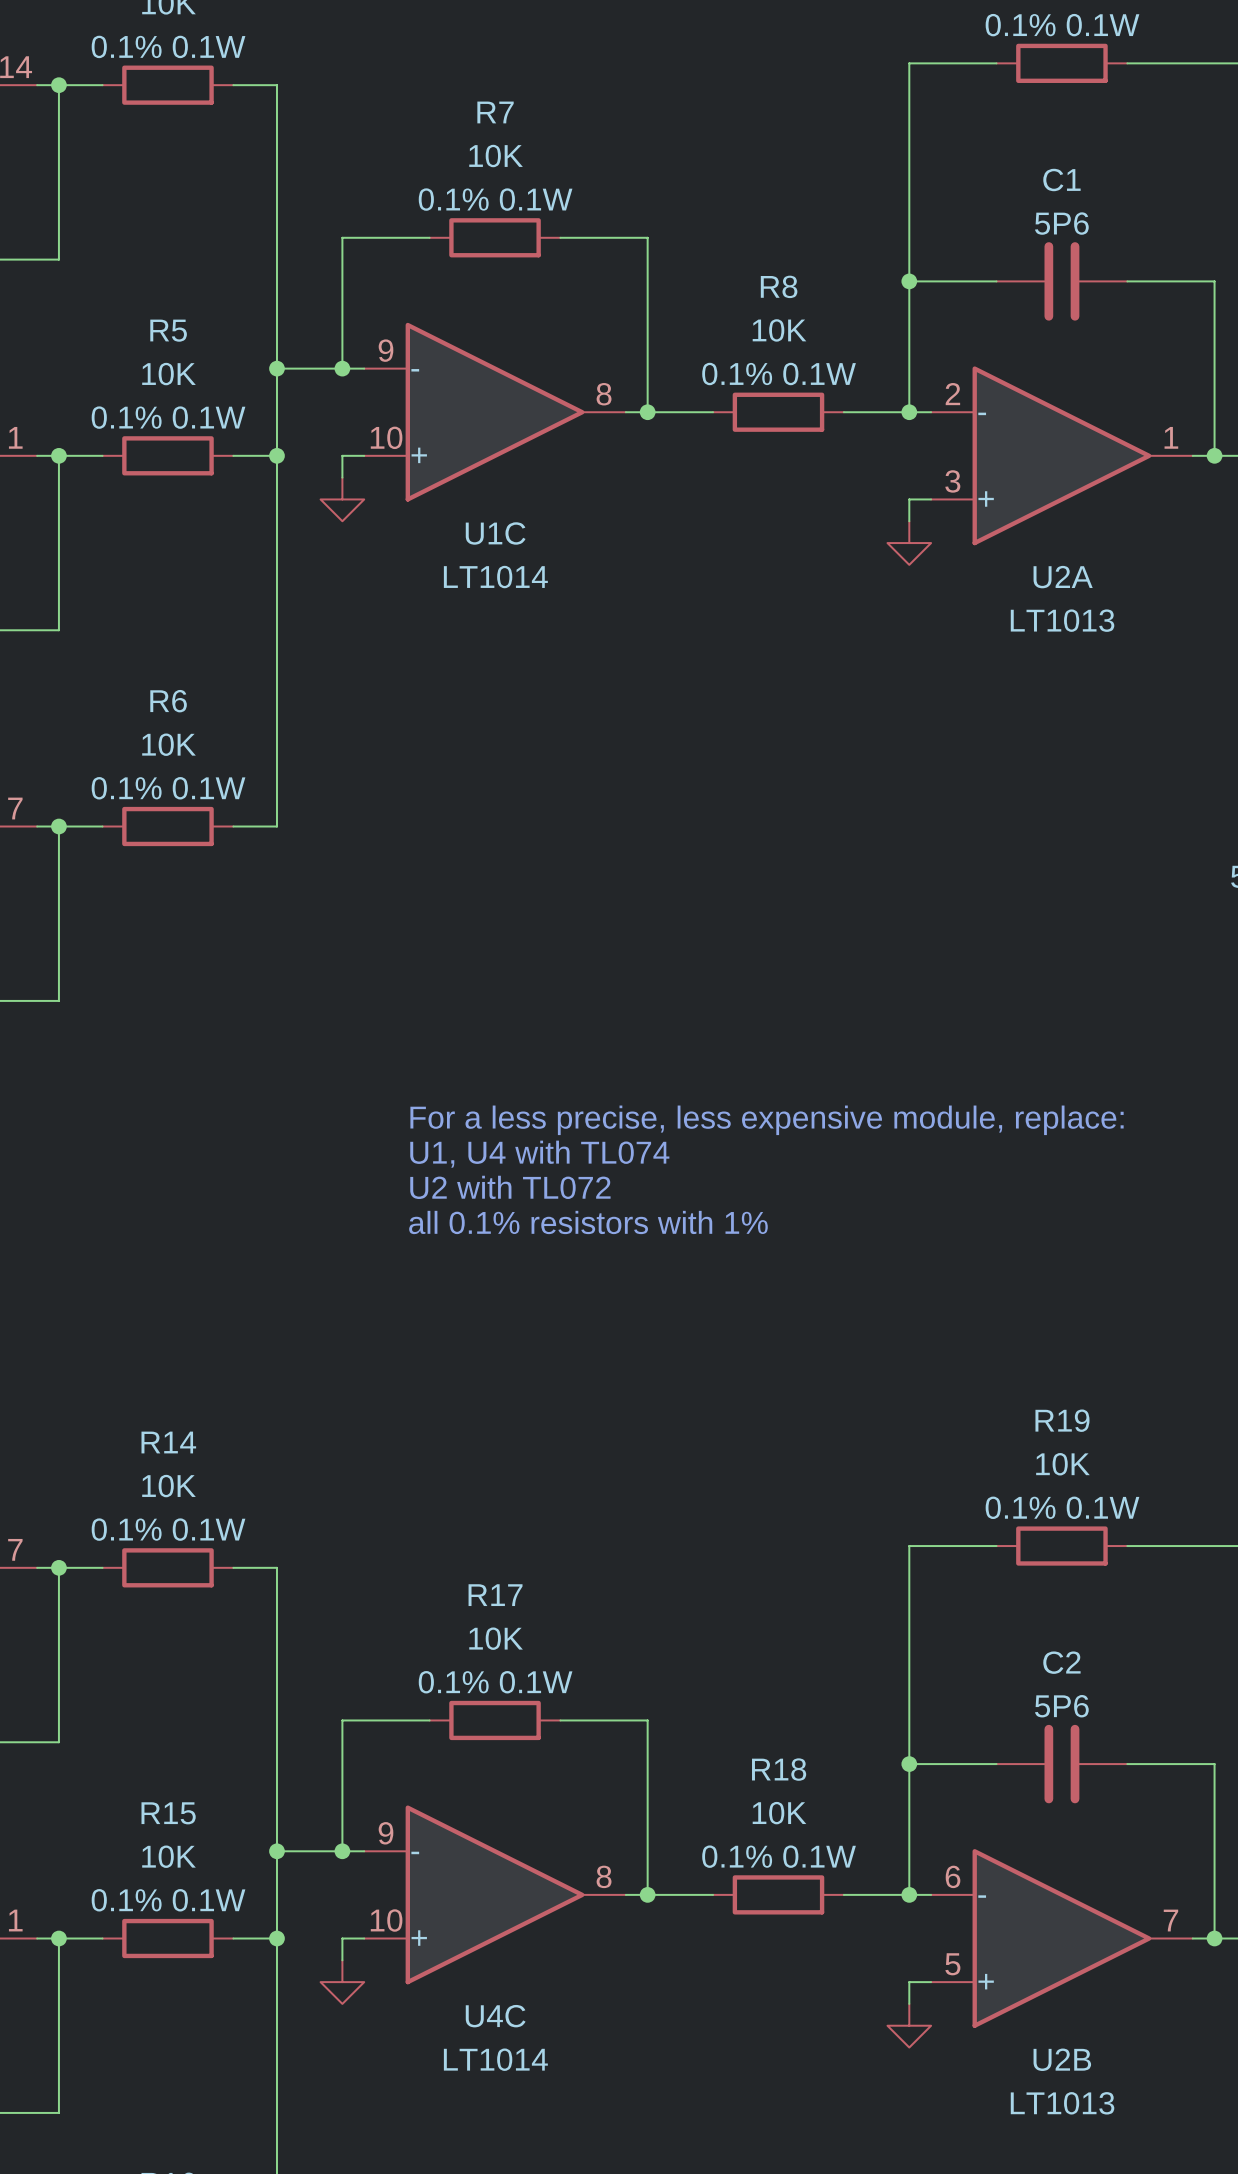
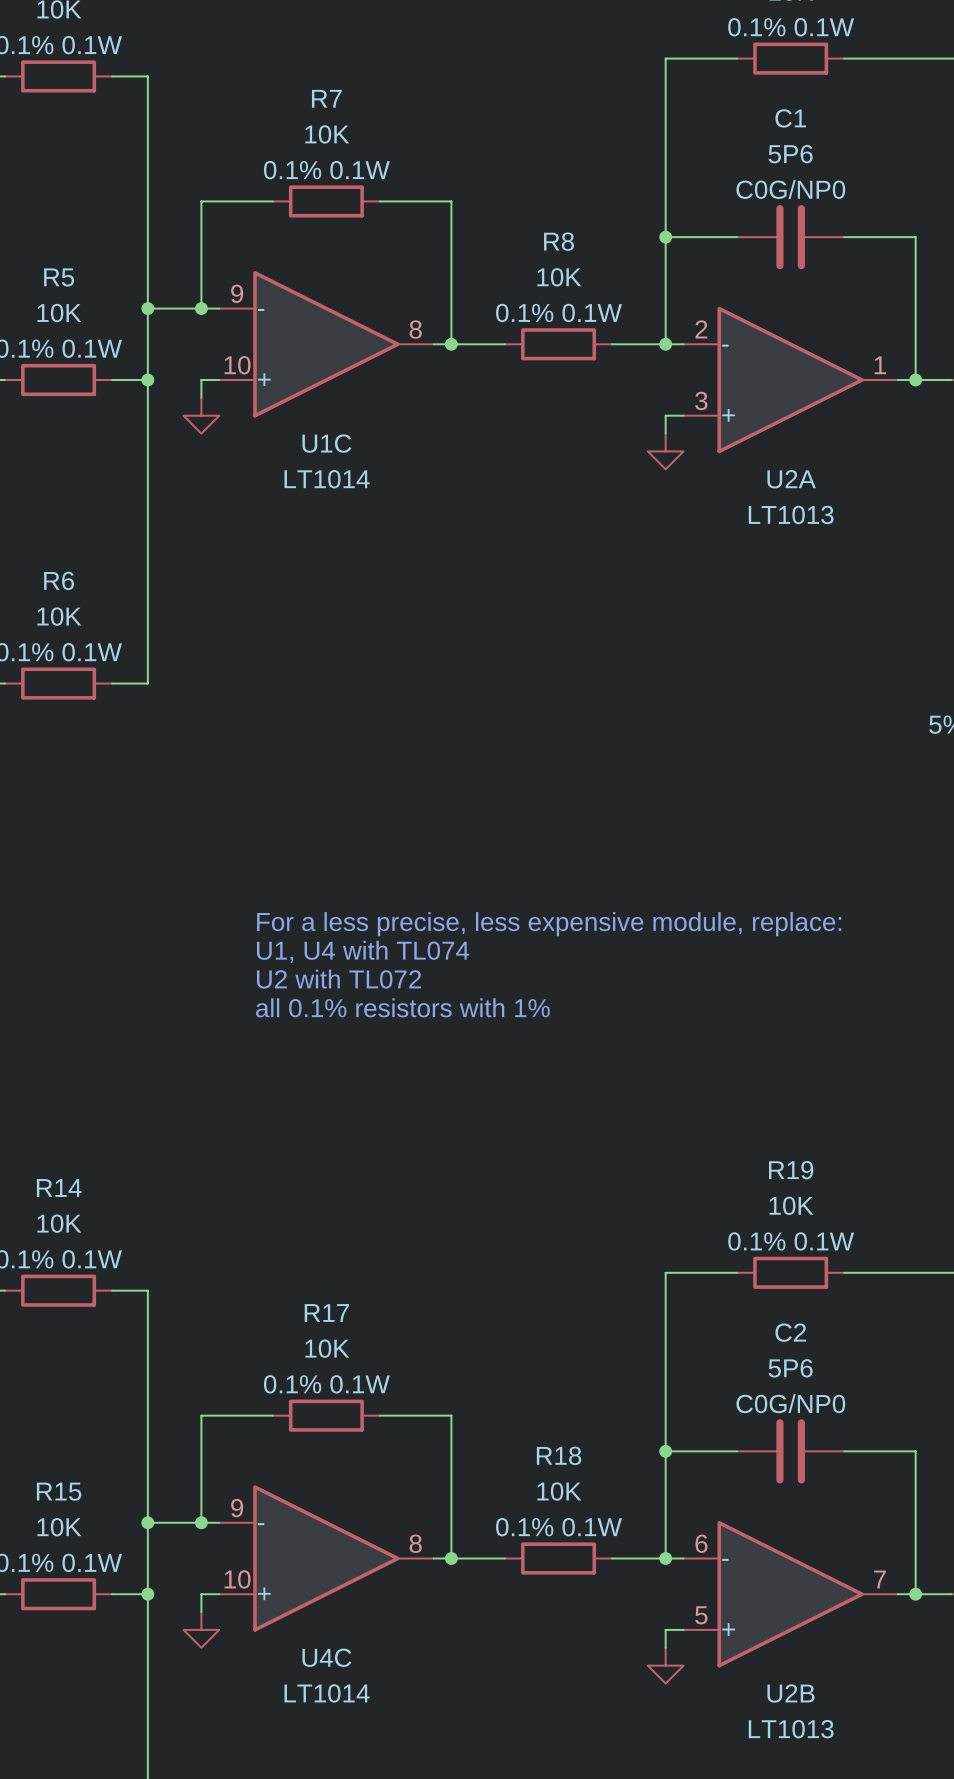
C1 name position: C1 (1061, 179) -> C1 (790, 118)
C1 value position: 5P6 (1061, 223) -> 5P6 (790, 154)
C1 text: none -> C0G/NP0 (790, 189)
C2 name position: C2 (1061, 1662) -> C2 (790, 1332)
C2 text: none -> C0G/NP0 (790, 1403)
C2 value position: 5P6 (1061, 1706) -> 5P6 (790, 1368)

